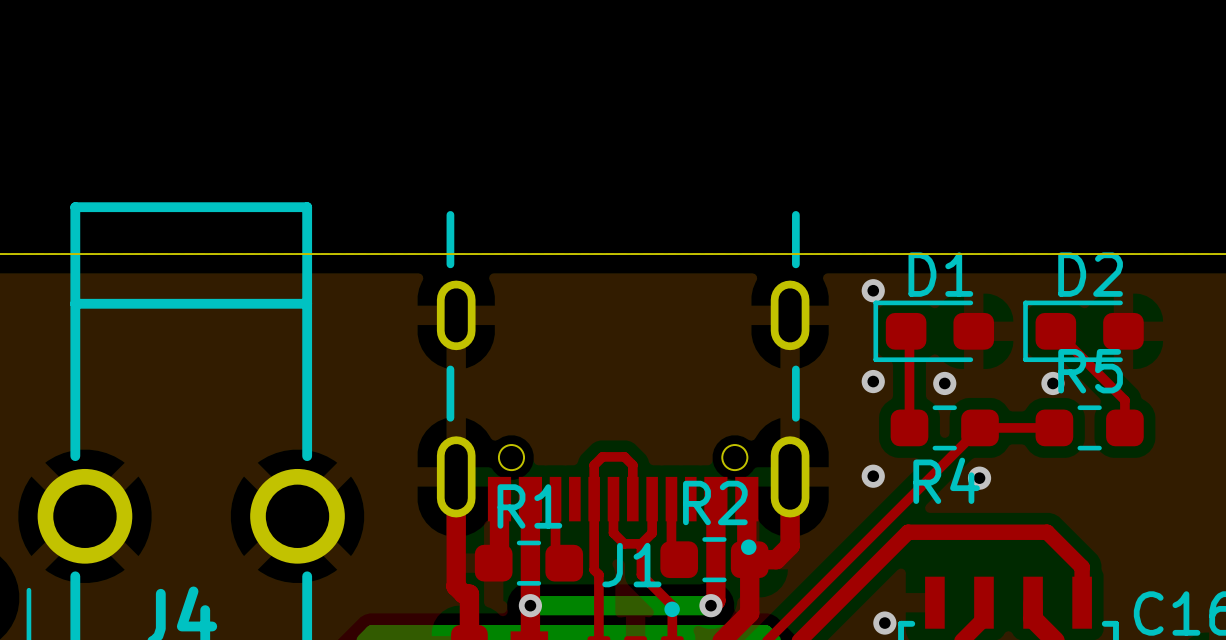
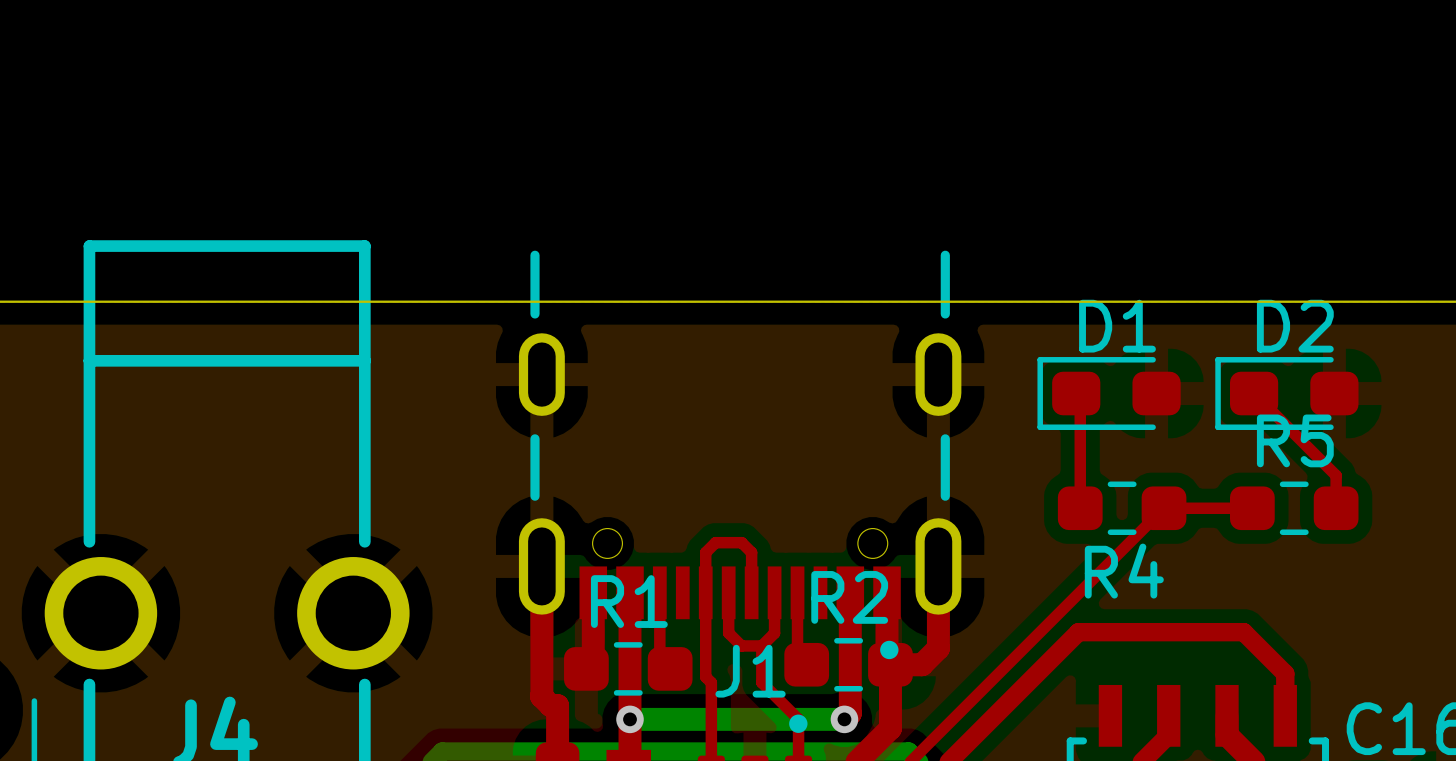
via: (873, 290) -> none
via: (873, 381) -> none
via: (944, 383) -> none
via: (1052, 383) -> none
via: (873, 476) -> none
via: (979, 478) -> none
via: (884, 623) -> none

